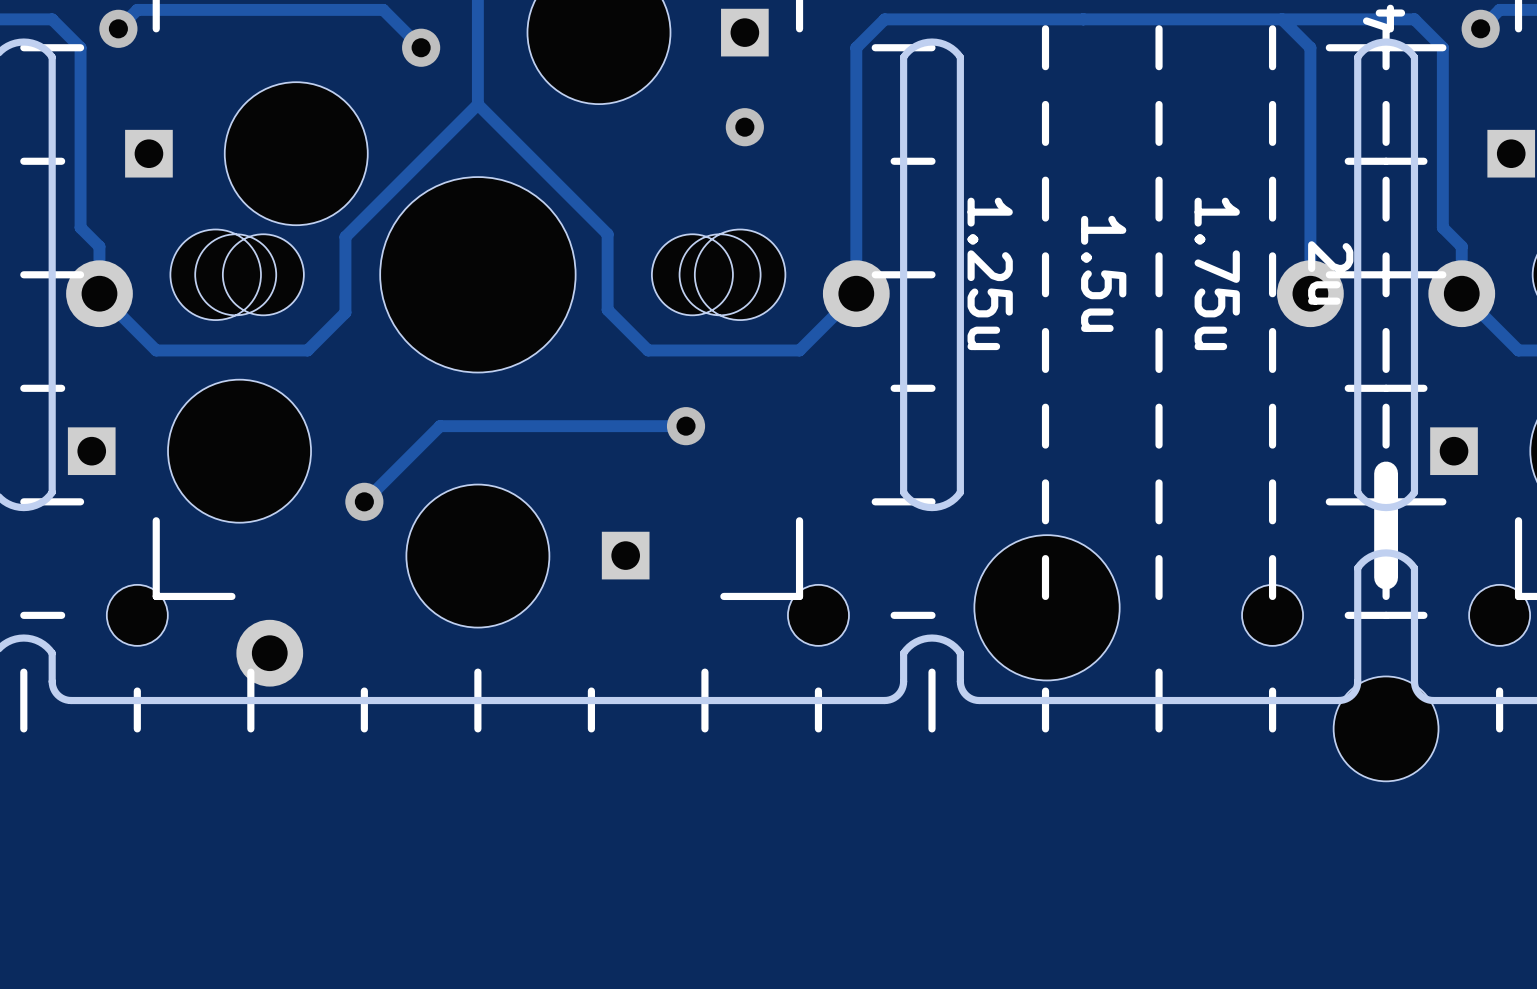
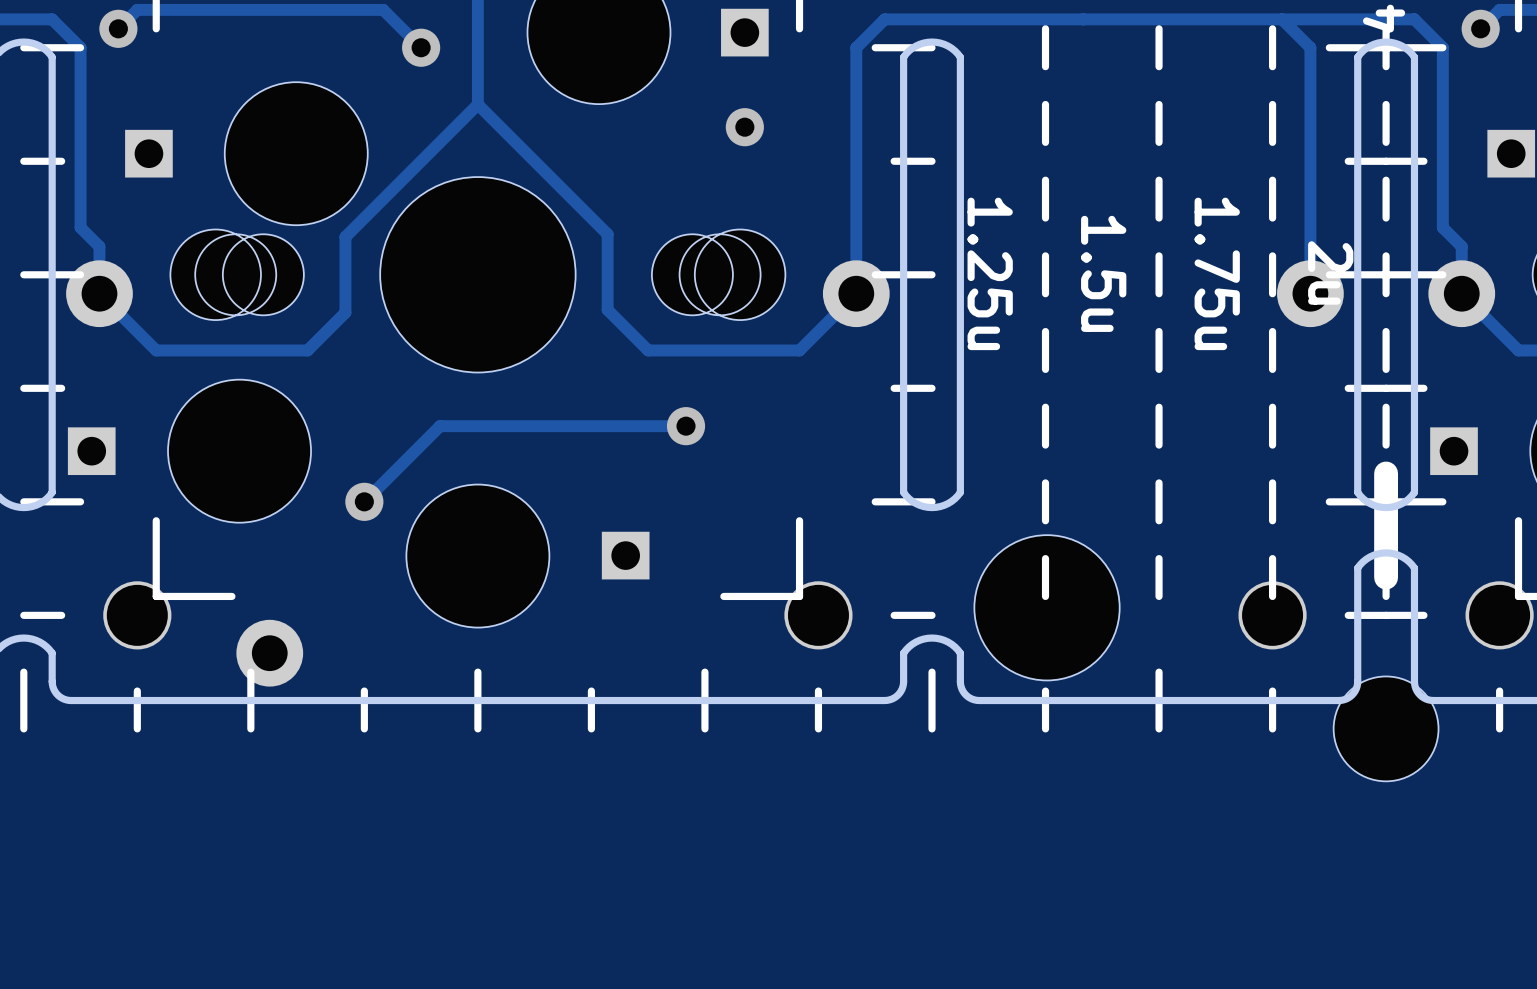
part footprint: [106, 584, 168, 646] -> [103, 581, 172, 650]
part footprint: [787, 584, 849, 646] -> [784, 581, 853, 650]
part footprint: [1242, 584, 1304, 646] -> [1238, 581, 1307, 650]
part footprint: [1469, 584, 1531, 646] -> [1465, 581, 1534, 650]

